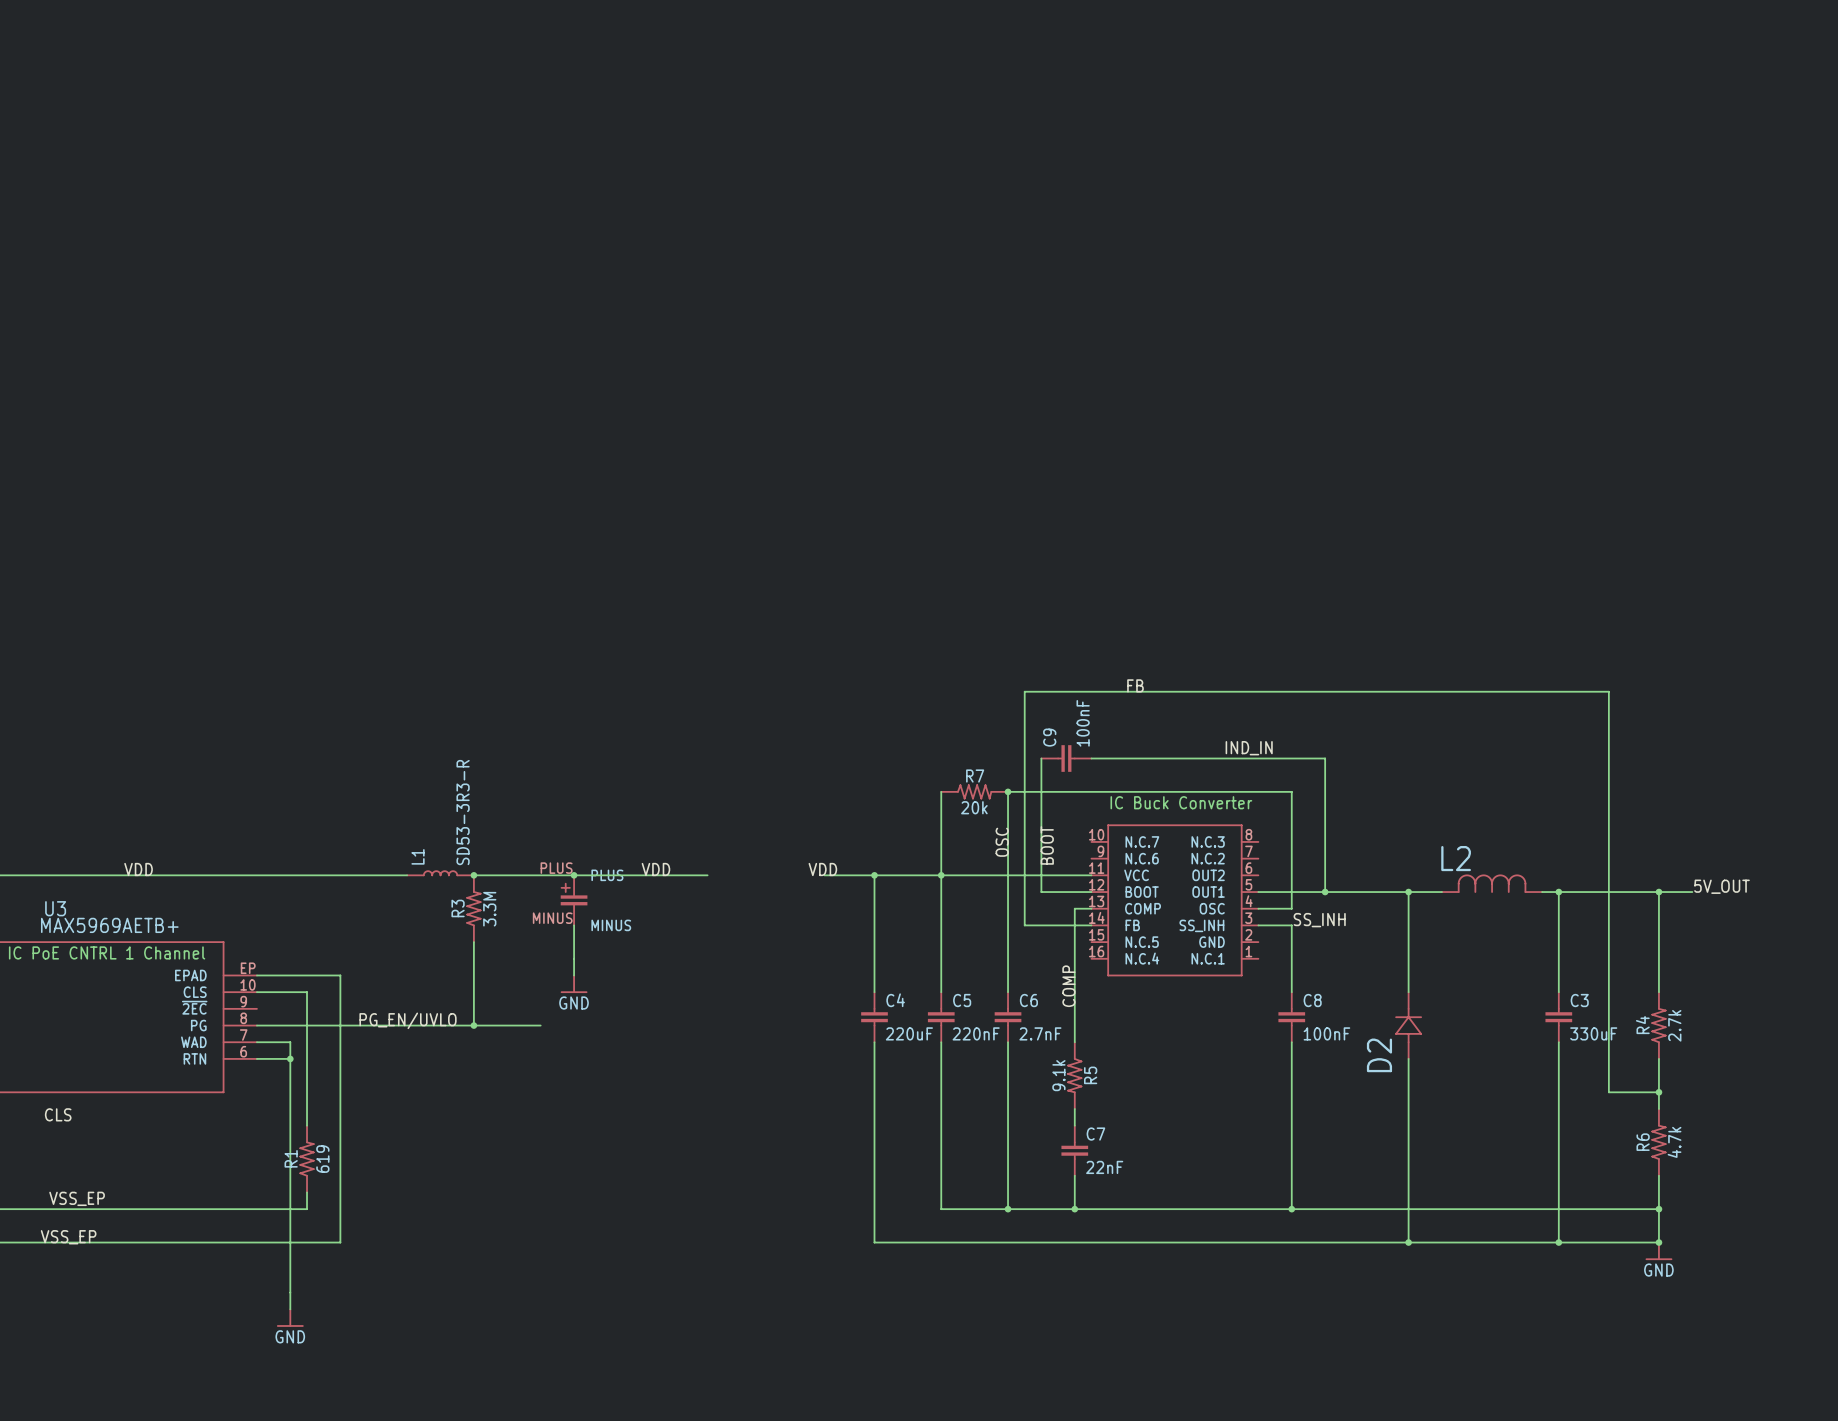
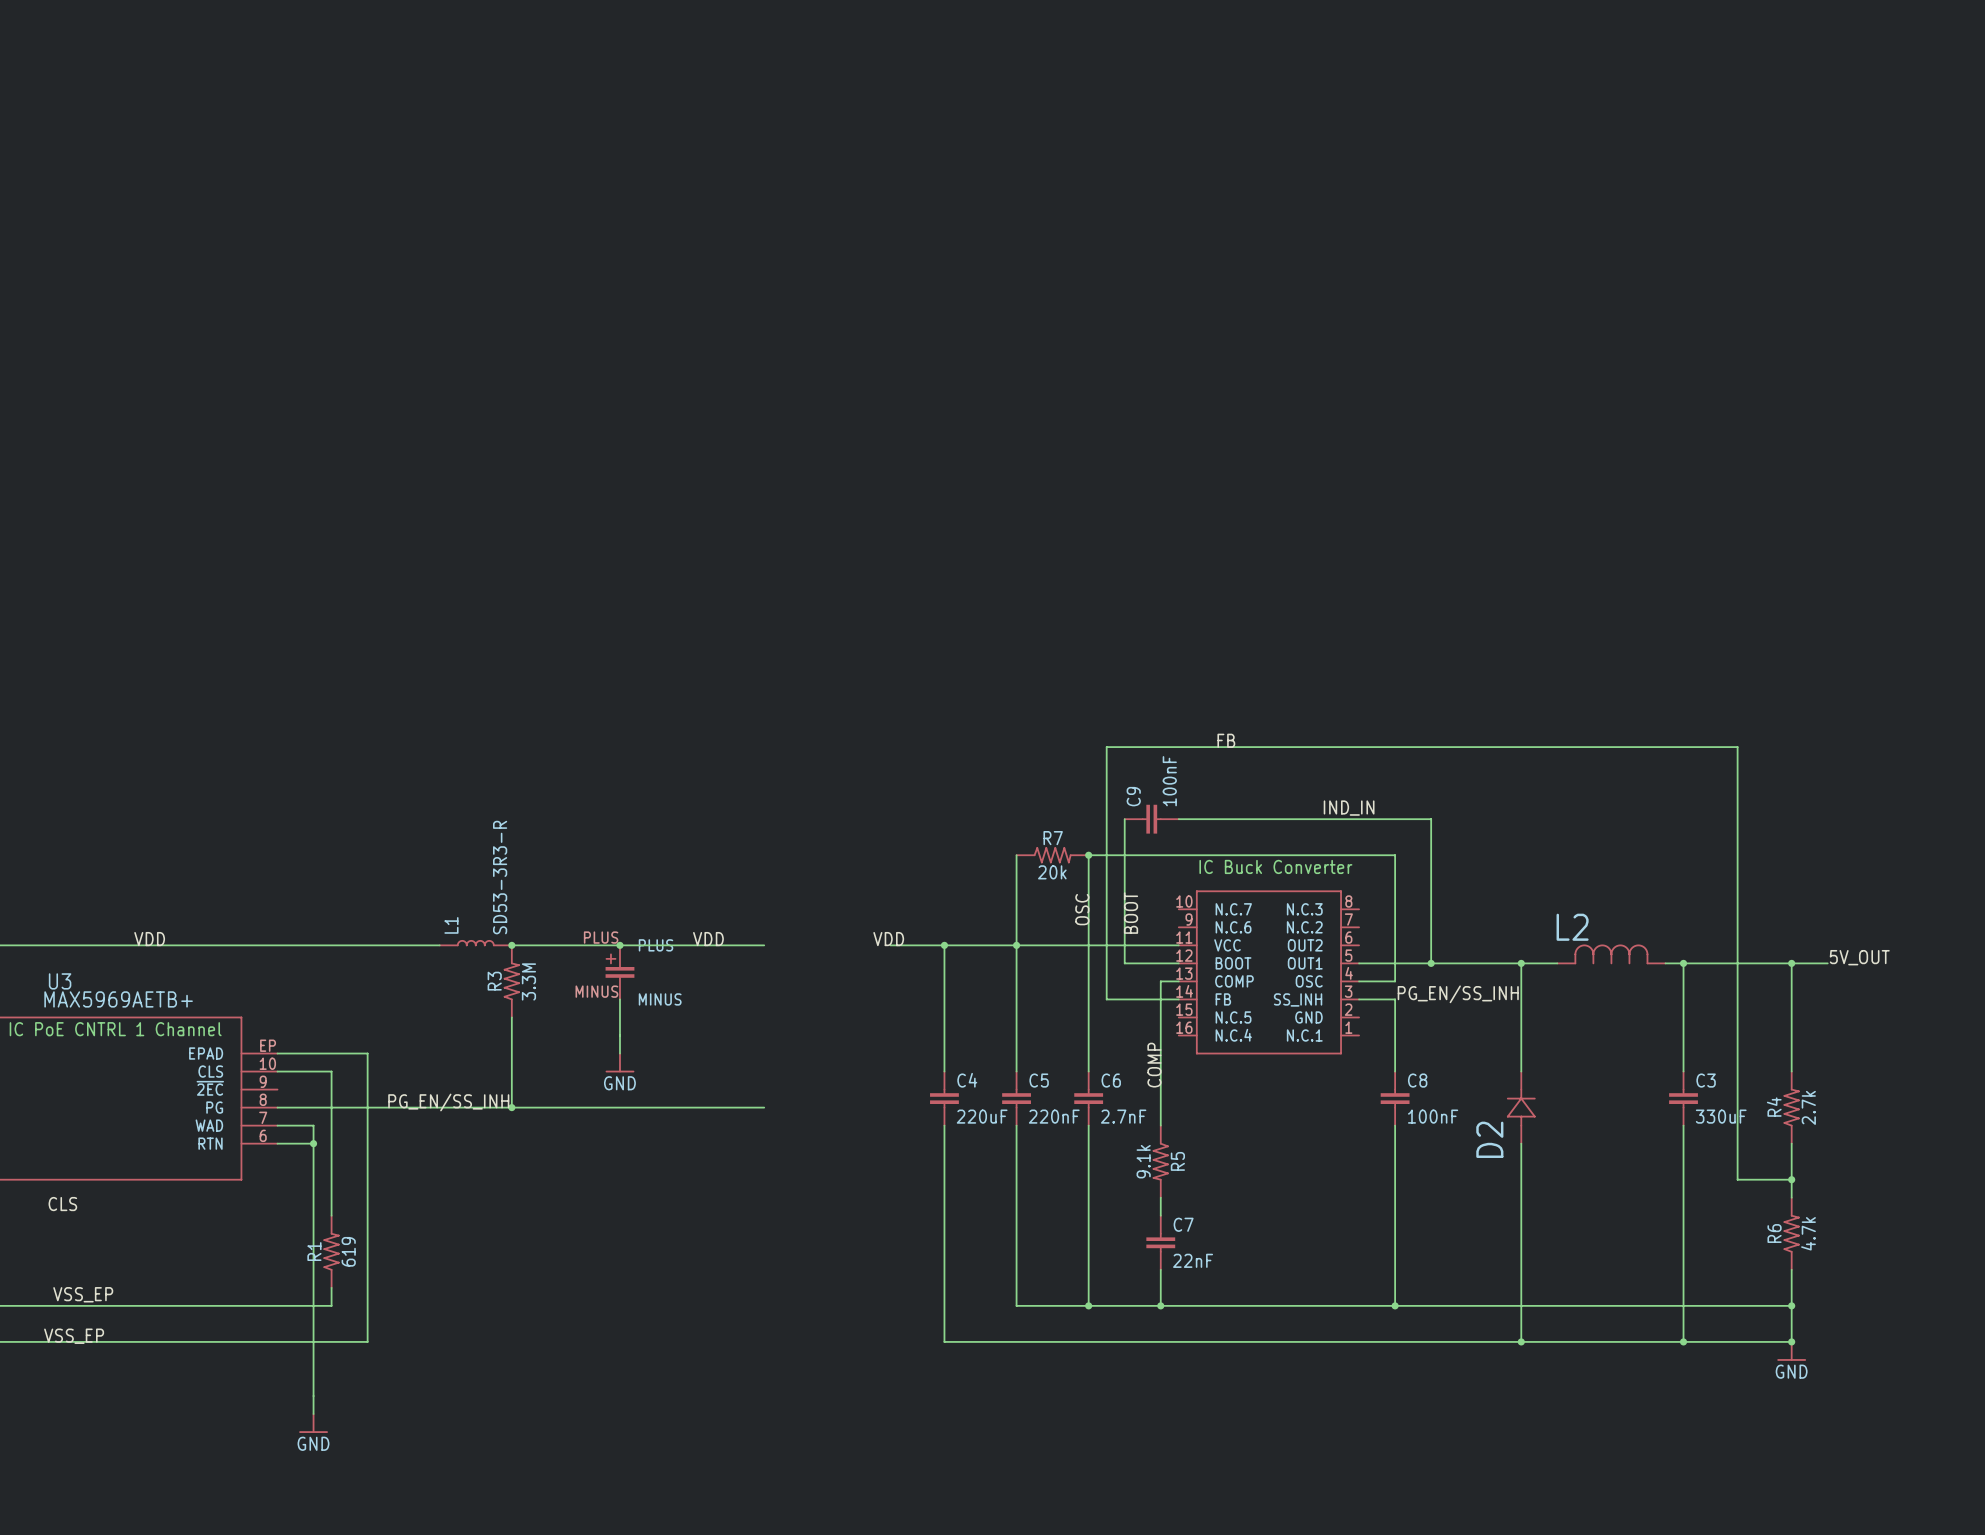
label: SS_INH (1319, 920) -> PG_EN/SS_INH (1458, 994)
label: PG_EN/UVLO (408, 1020) -> PG_EN/SS_INH (448, 1102)
wire: none -> (583, 1107) (764, 1107)

